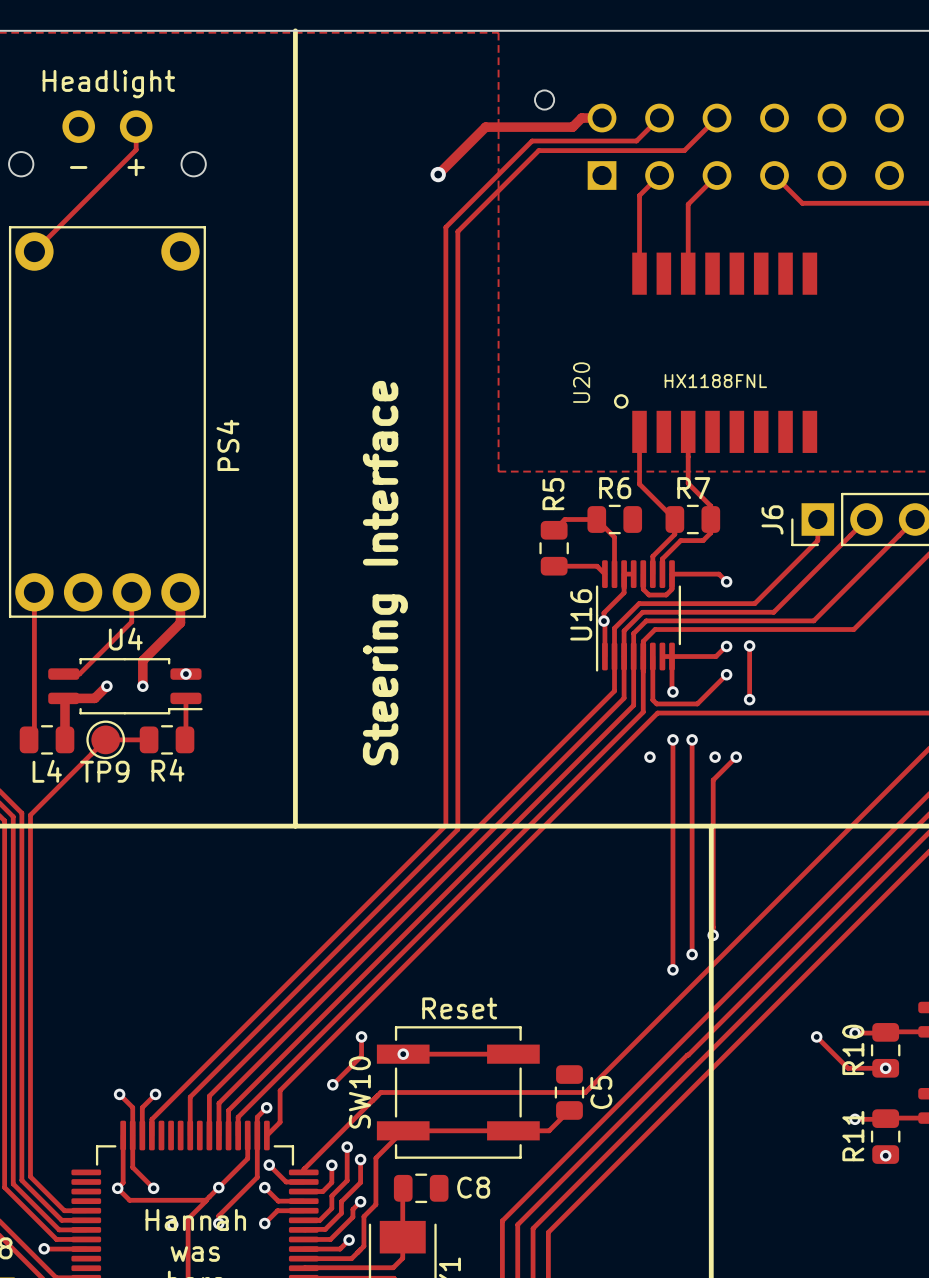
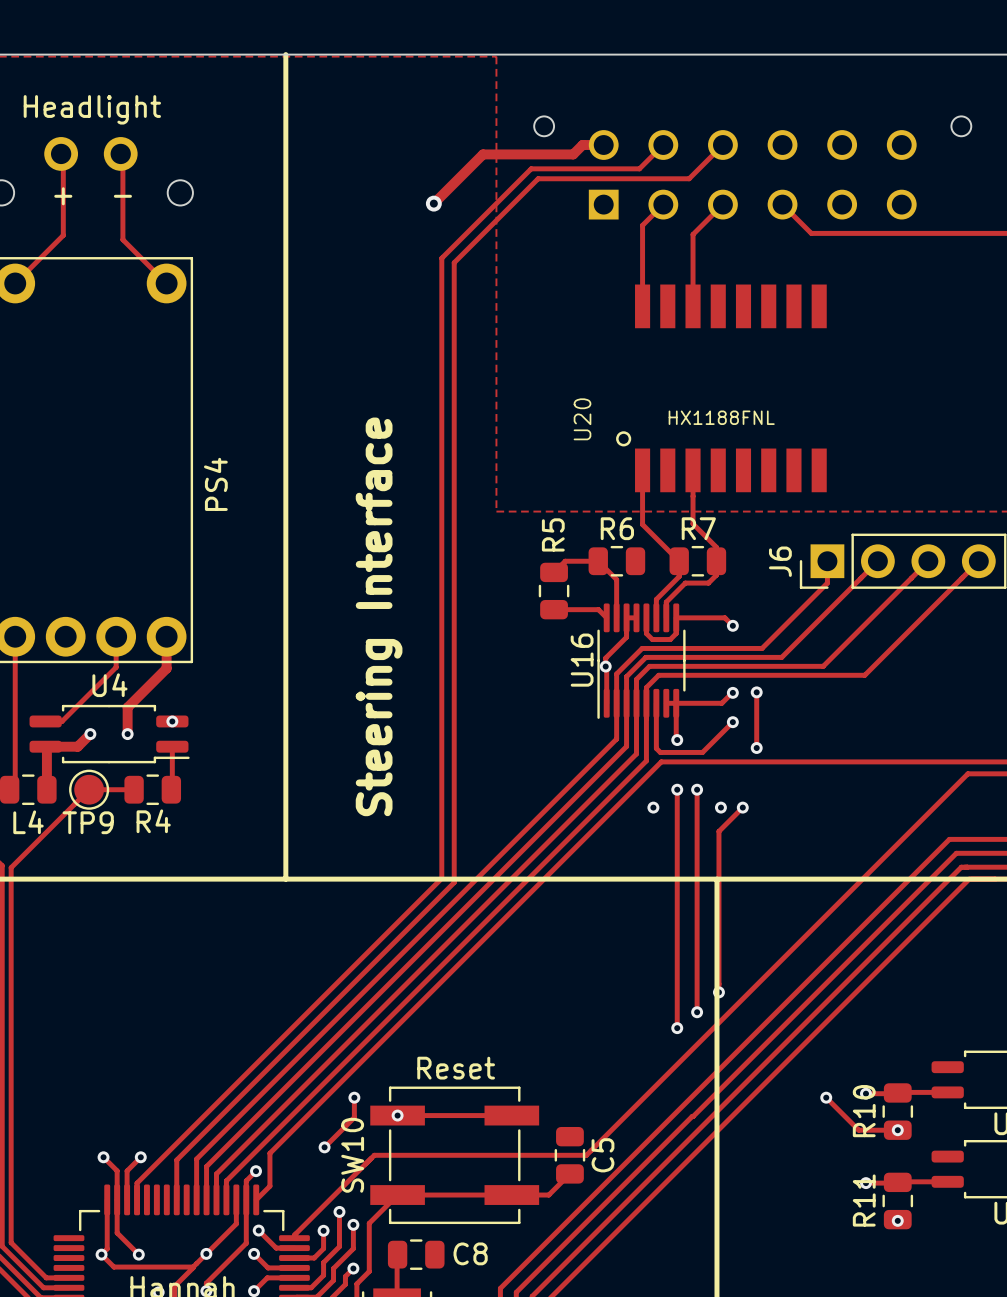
track: (136, 126) (136, 149) (80, 205) -> (63, 153) (63, 235)
track: none -> (122, 153) (122, 239) (166, 283)
text position: - (78, 167) -> - (122, 196)
text position: + (136, 167) -> + (63, 196)

